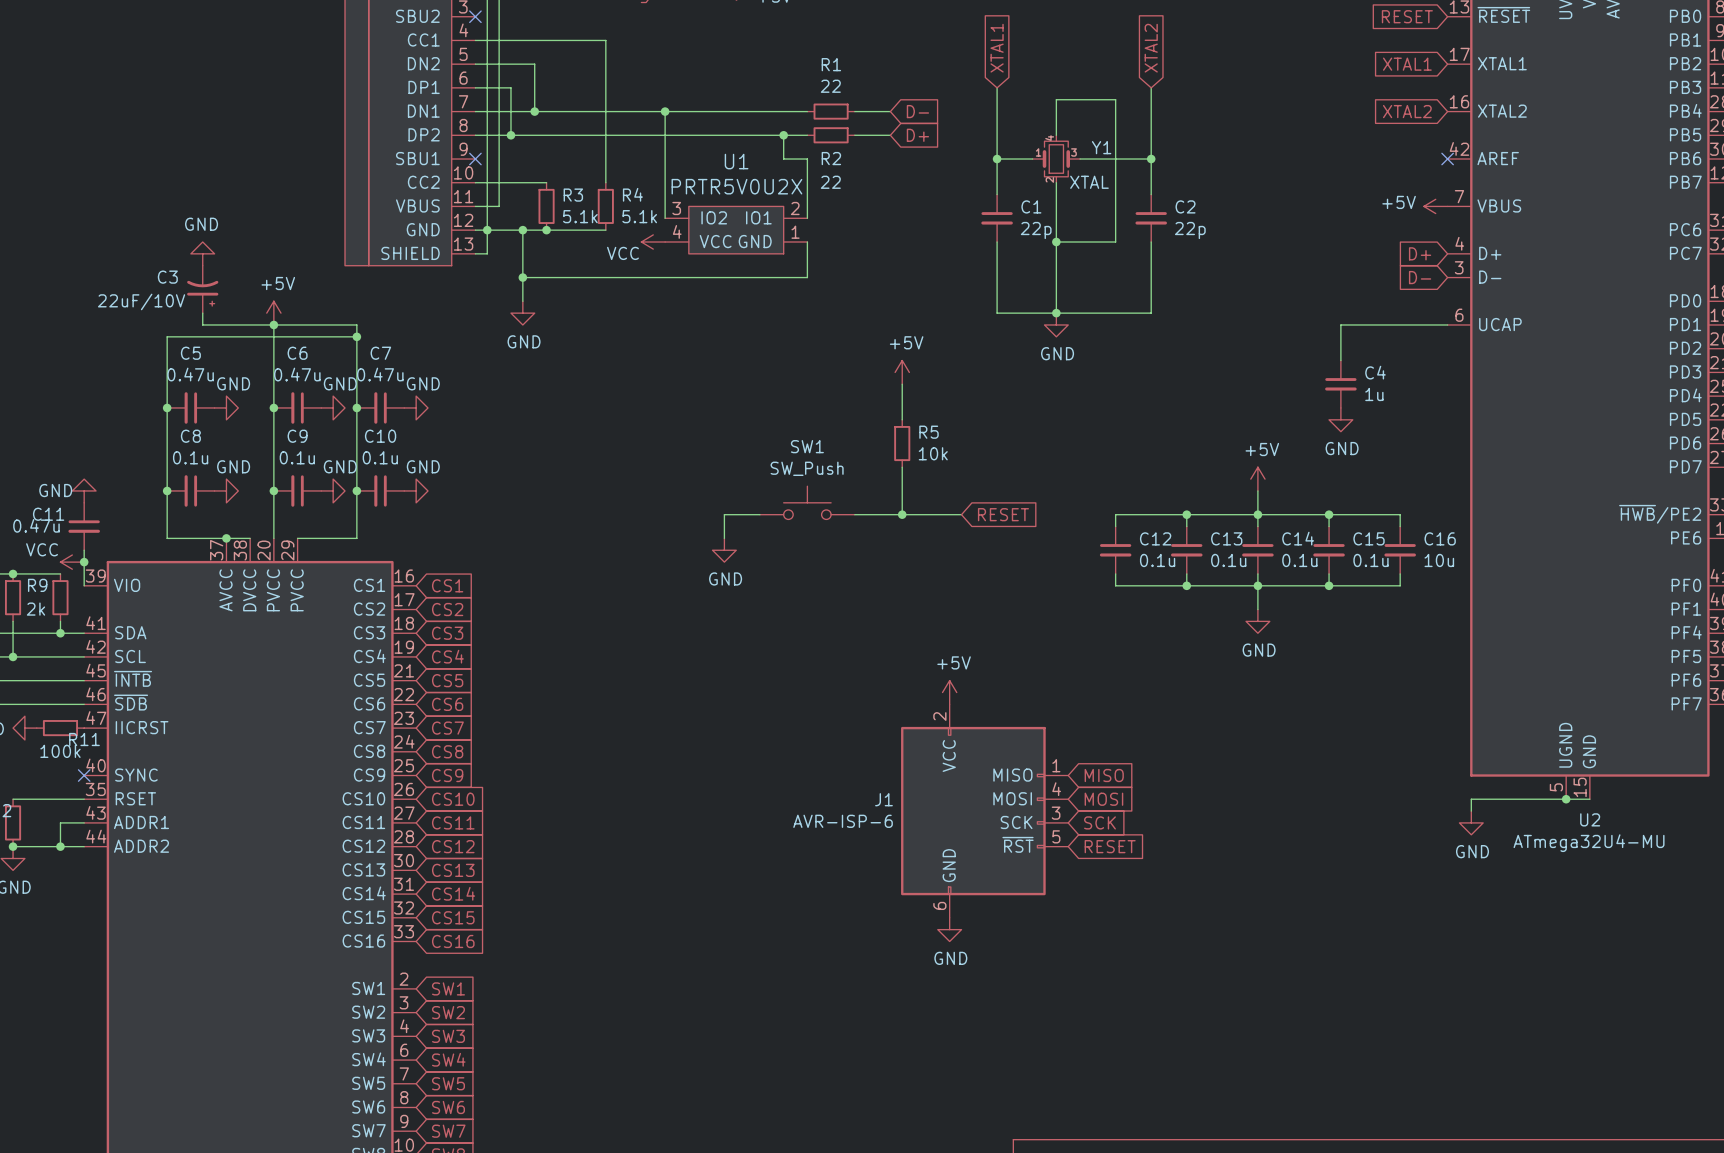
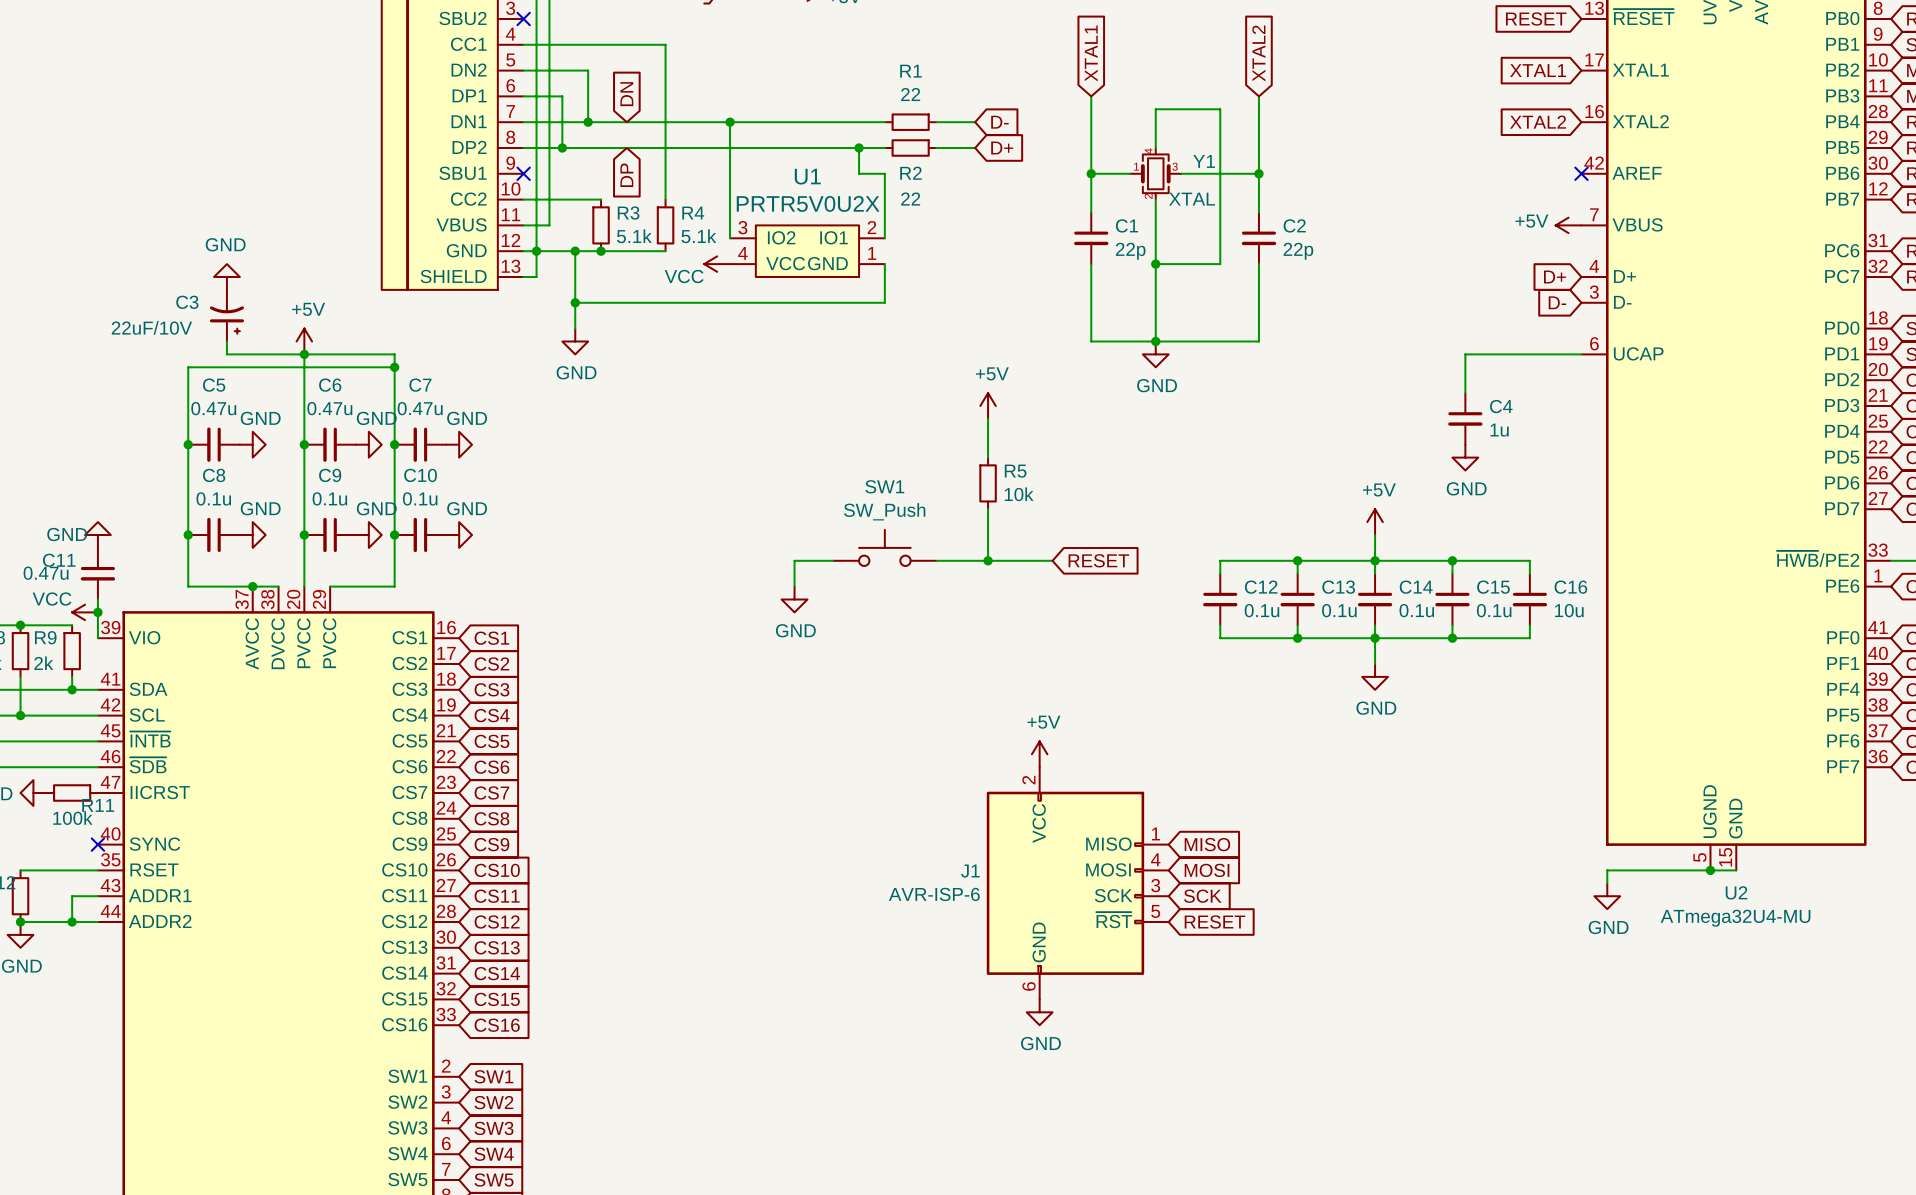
global label: none -> DN (626, 94)
global label: none -> DP (626, 175)

